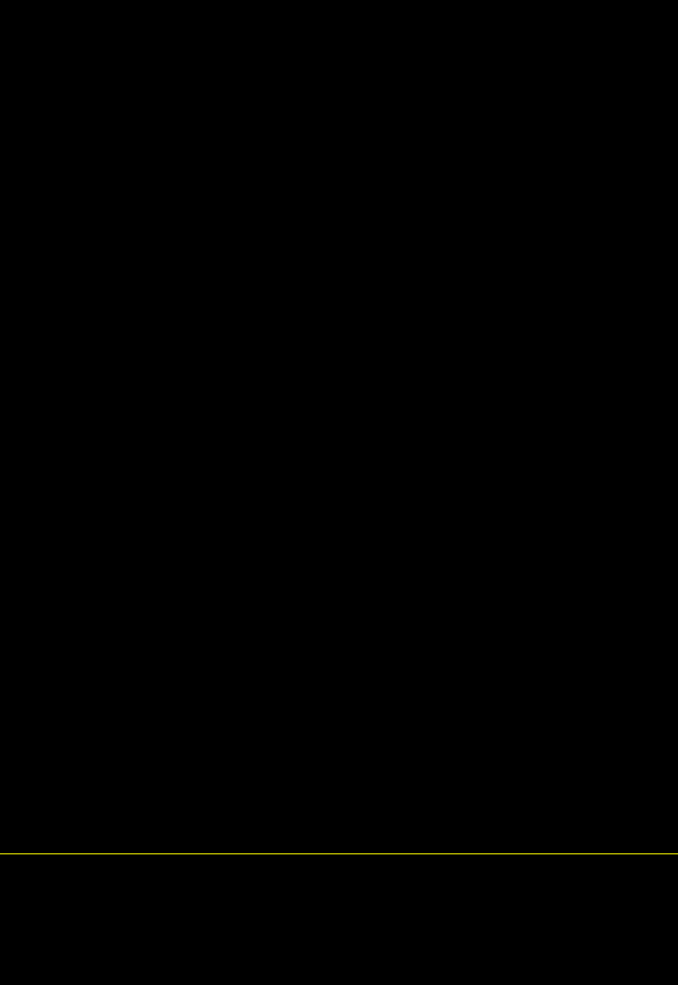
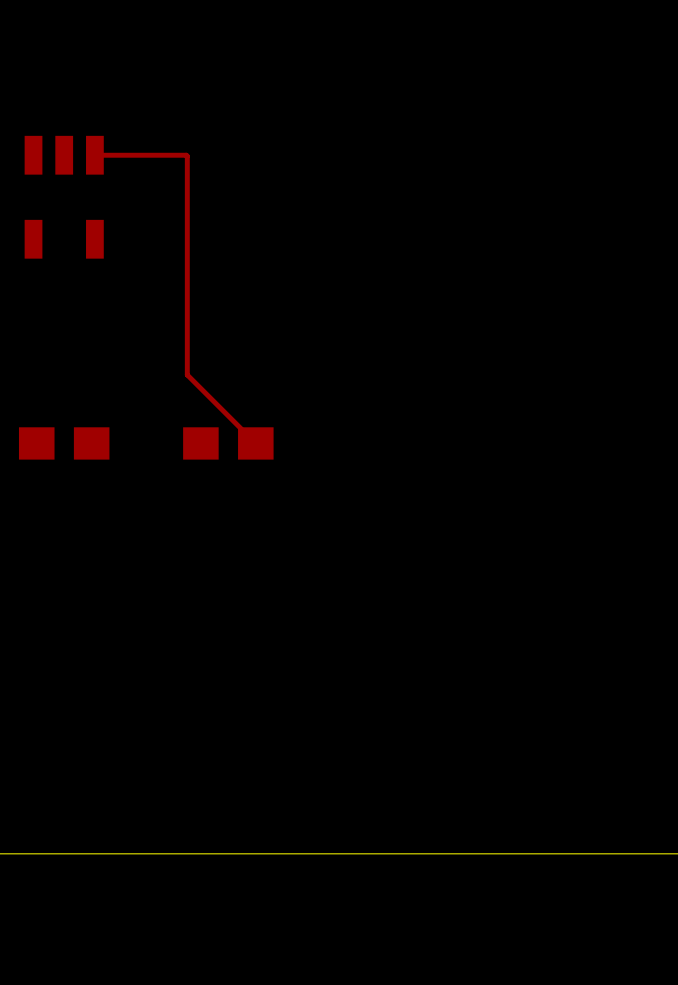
top track: none -> (94, 155) (187, 156) (187, 374) (255, 443)
part: none -> (64, 197)
part: none -> (64, 443)
part: none -> (228, 443)

